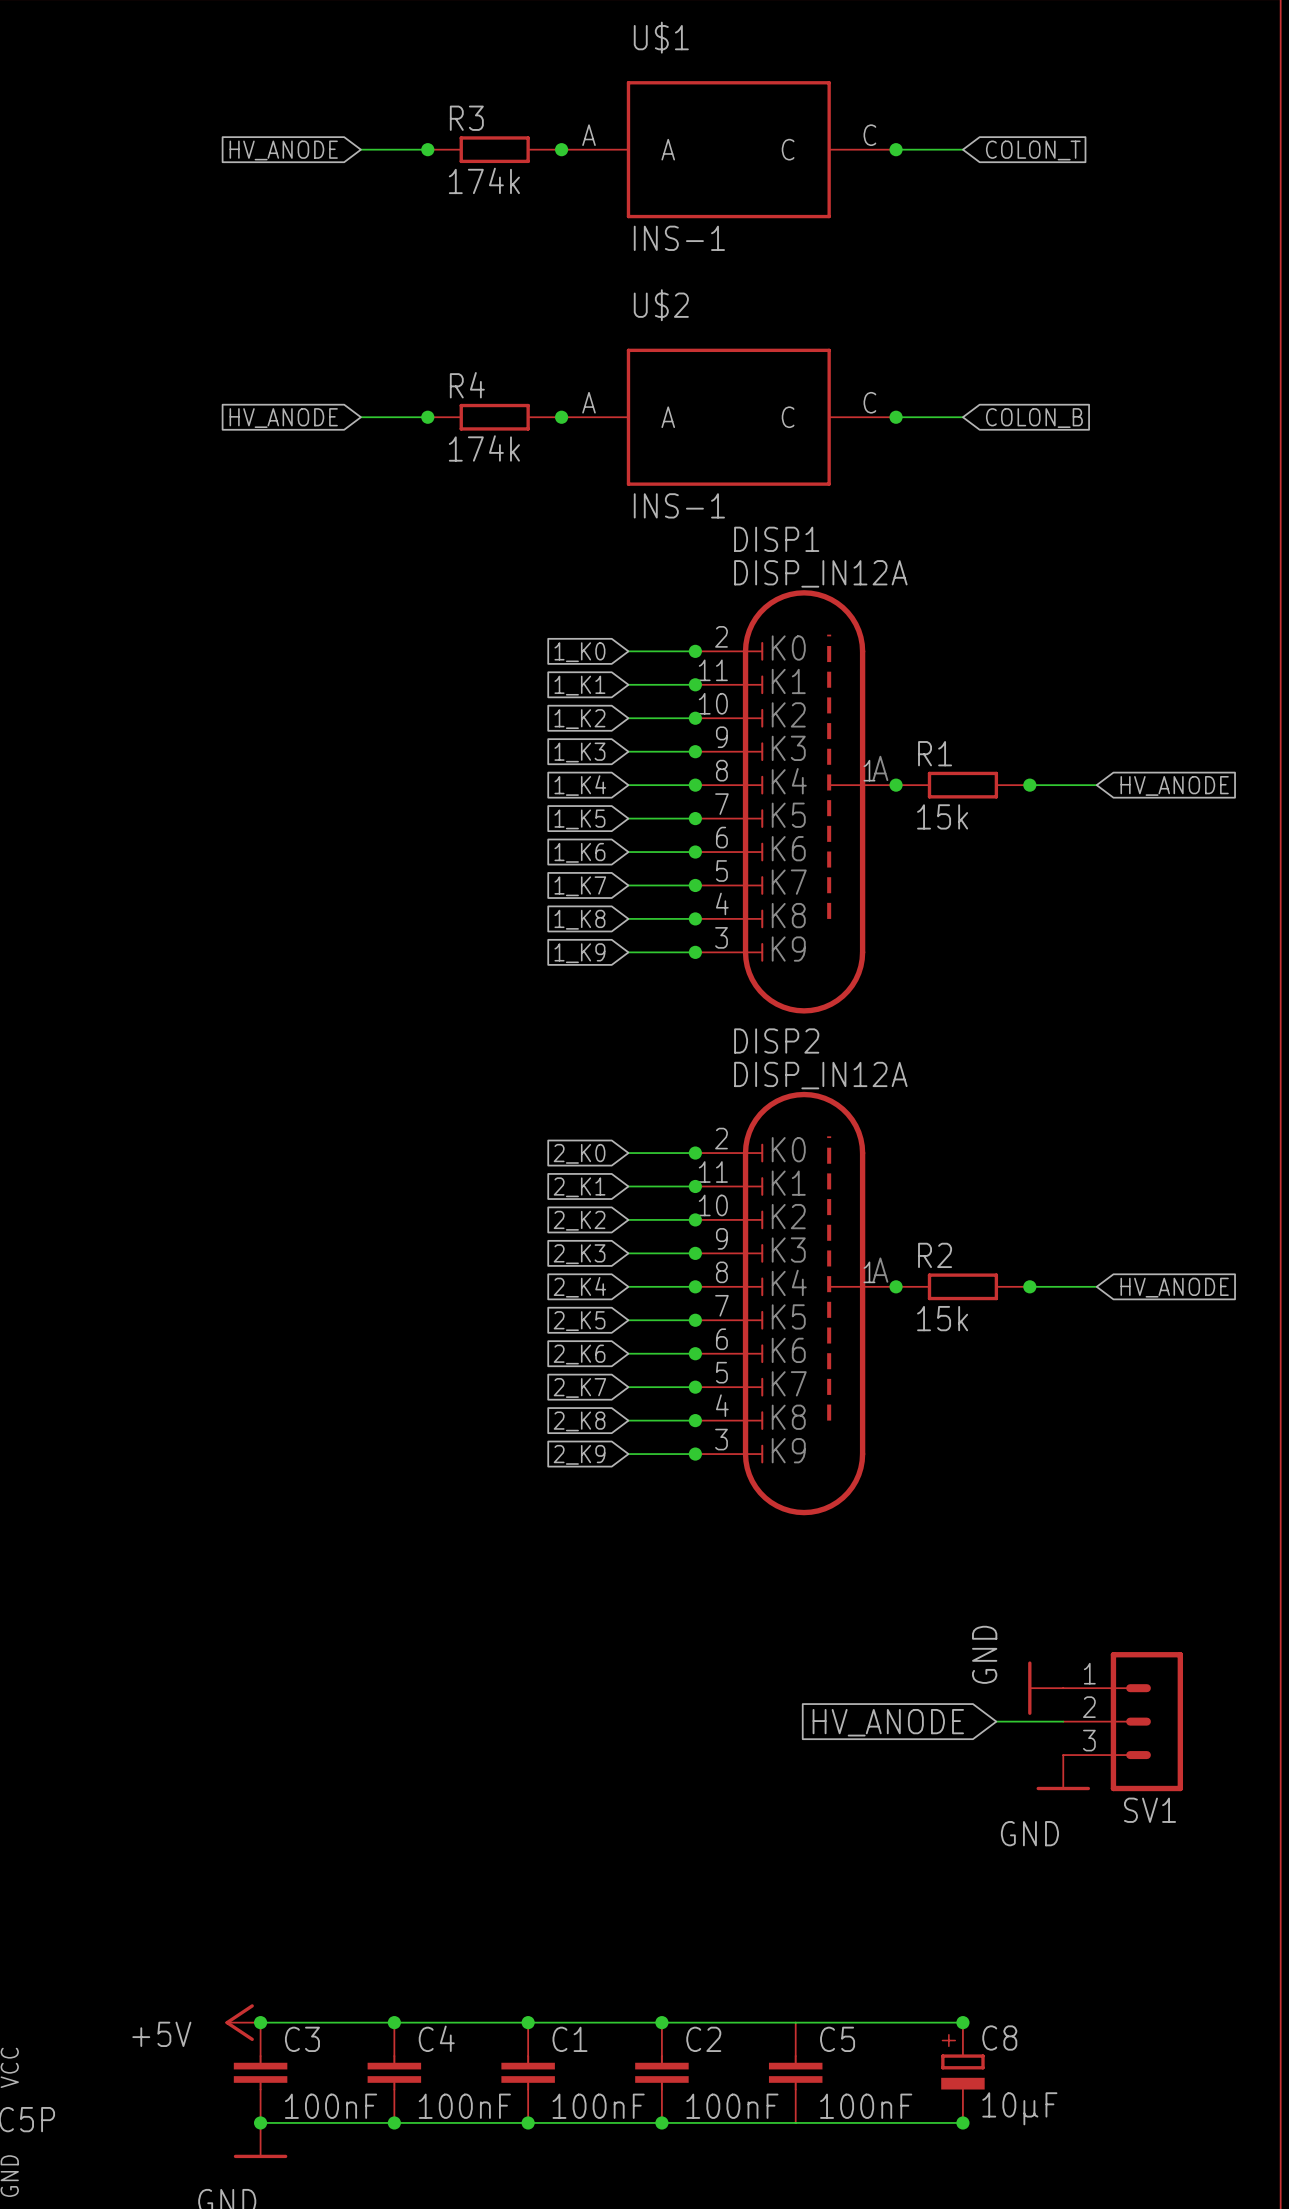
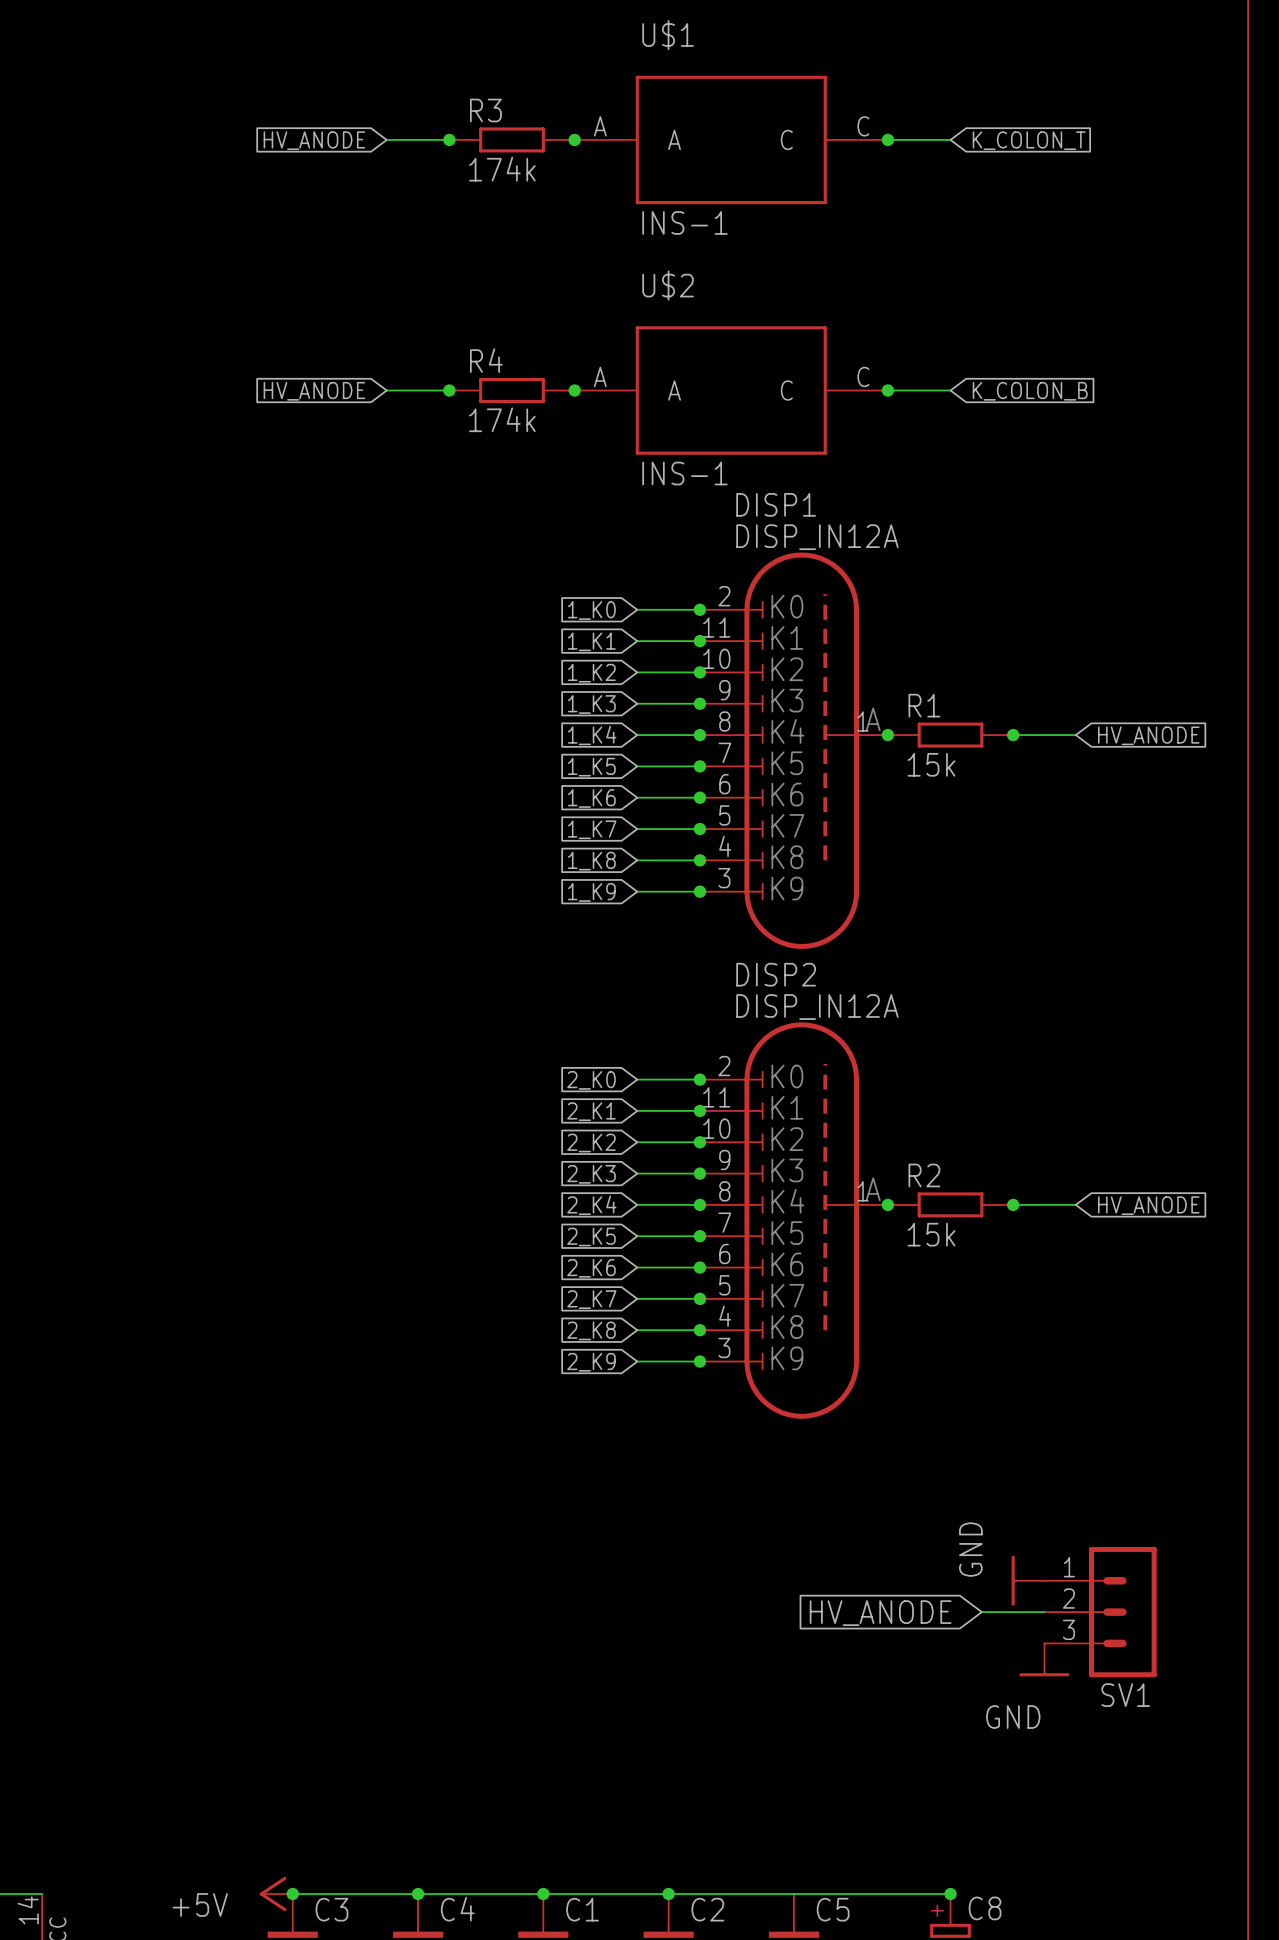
global label: COLON_T (1033, 150) -> K_COLON_T (1029, 140)
global label: COLON_B (1034, 418) -> K_COLON_B (1030, 391)

